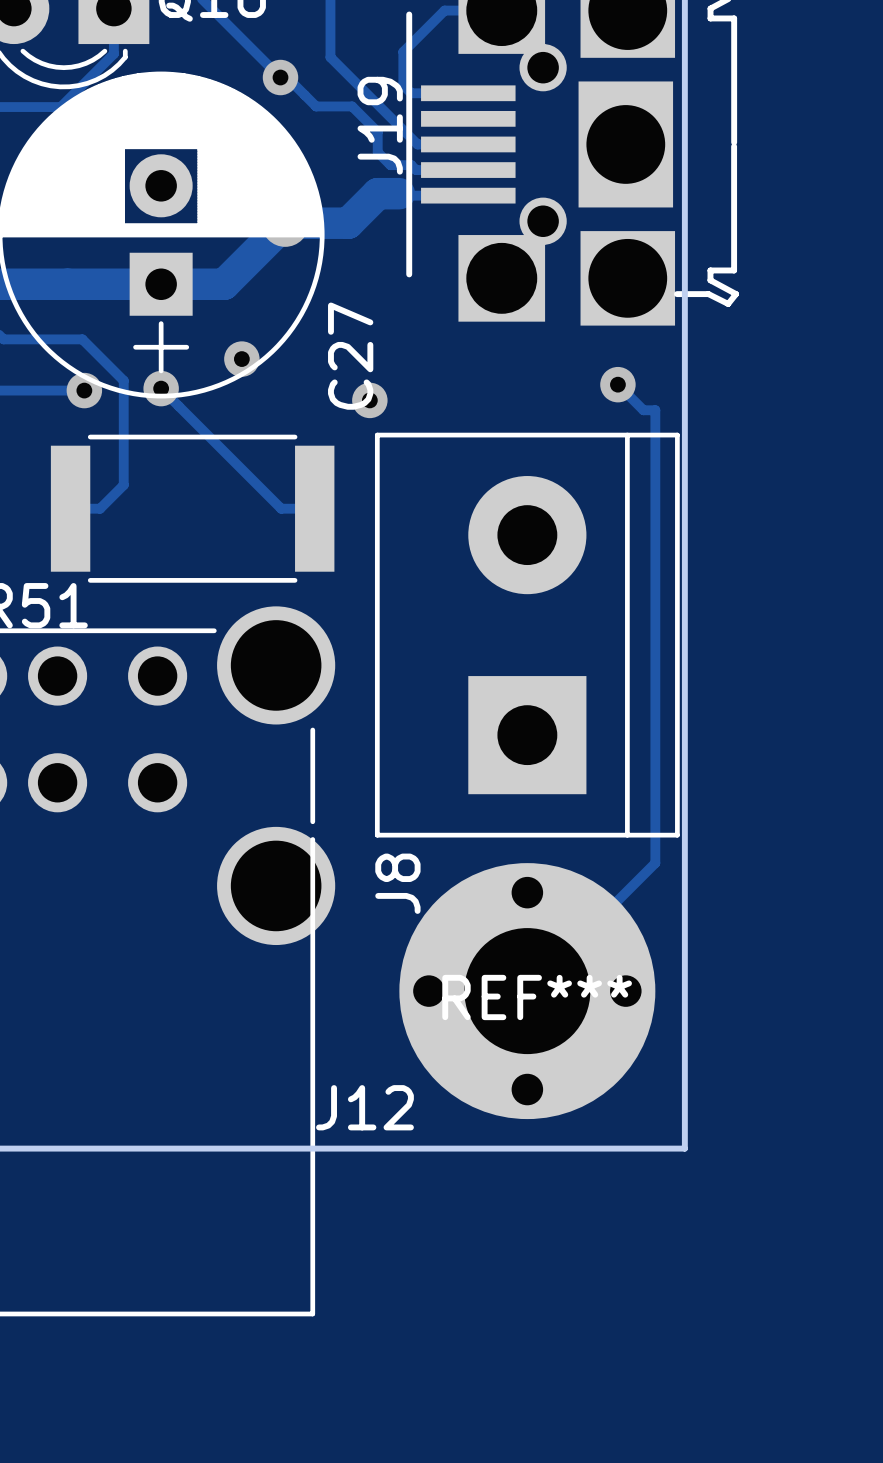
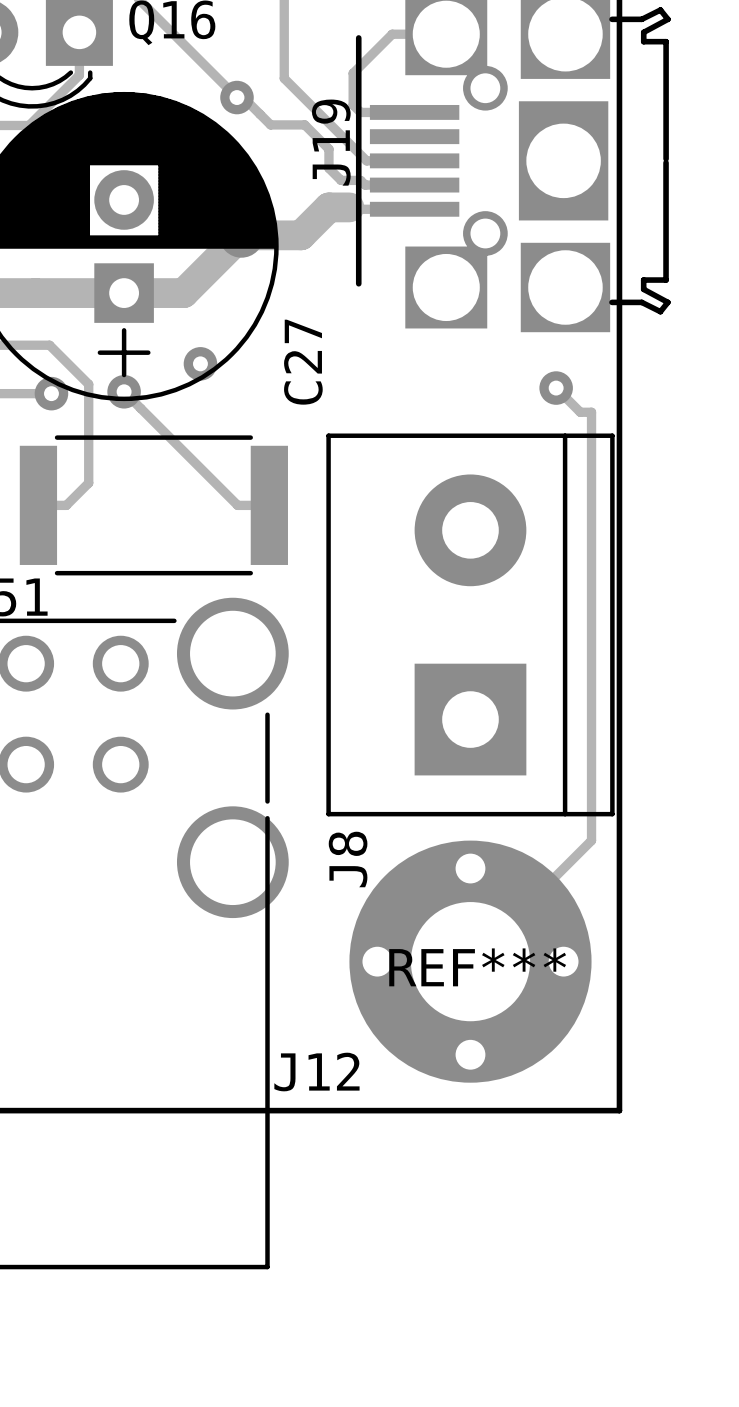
via: (369, 400) -> none

